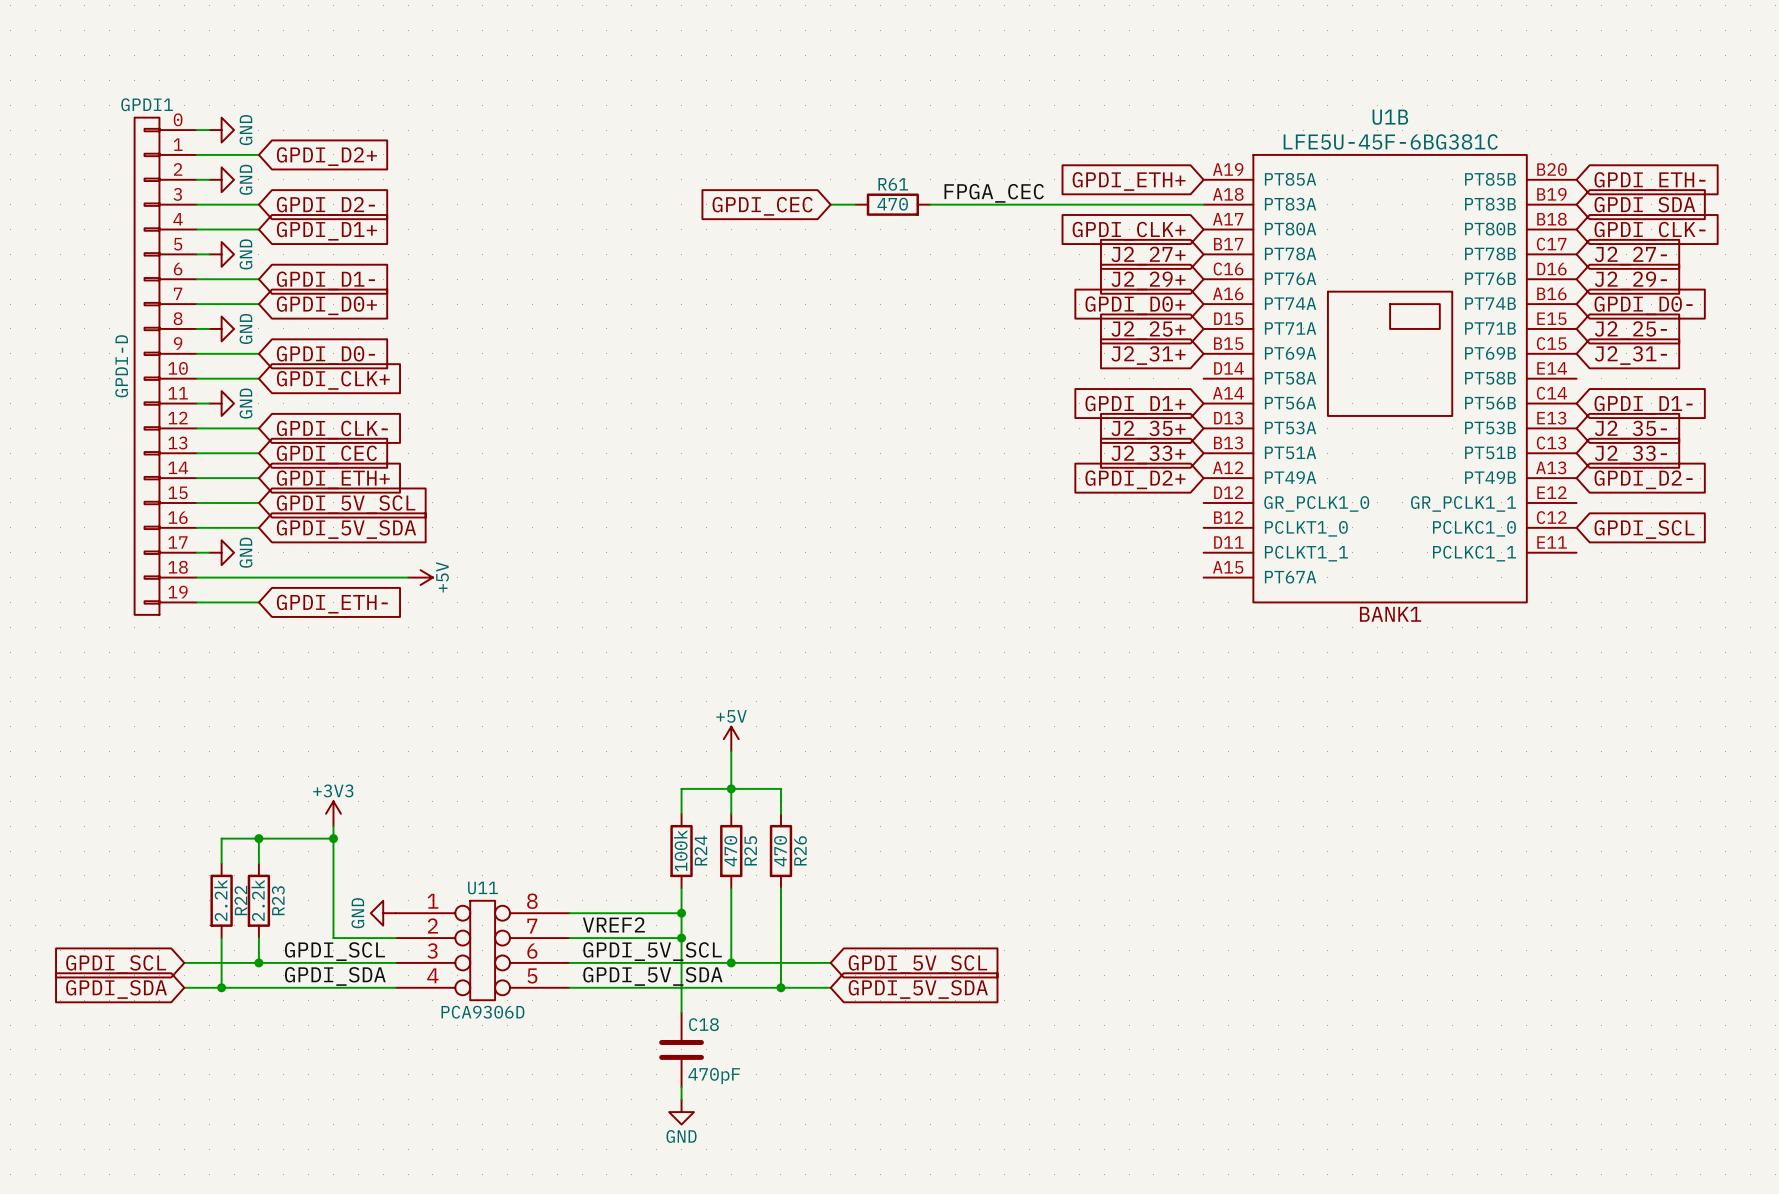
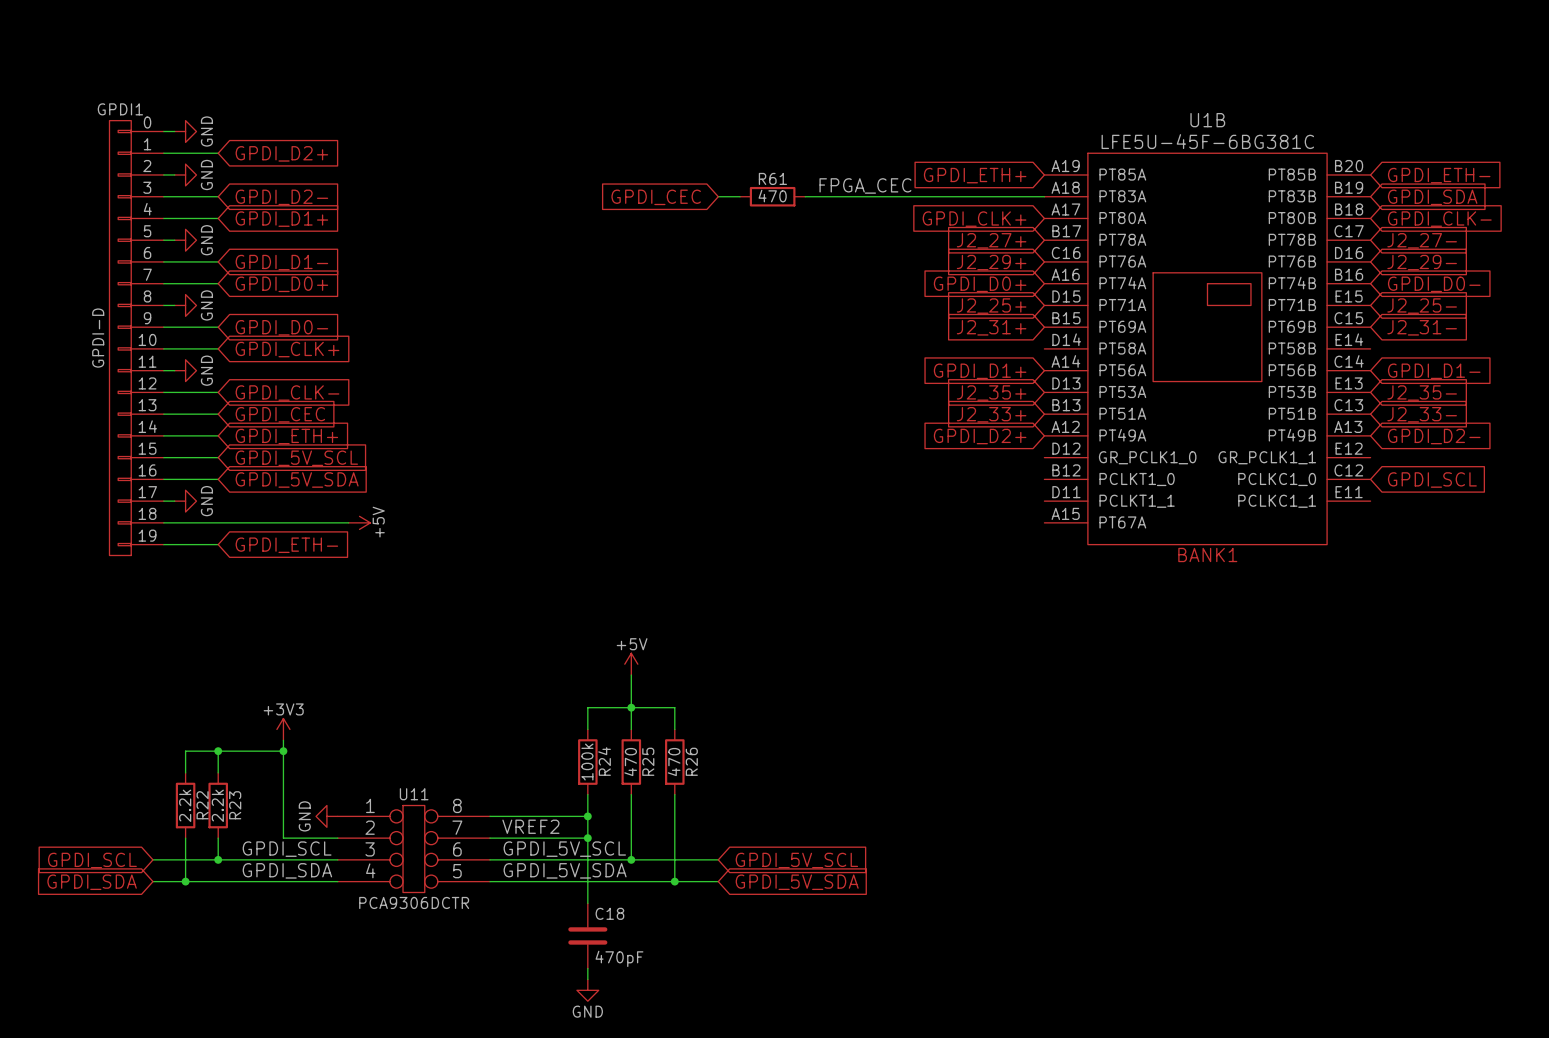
U11 value: PCA9306D (482, 1012) -> PCA9306DCTR (414, 902)

